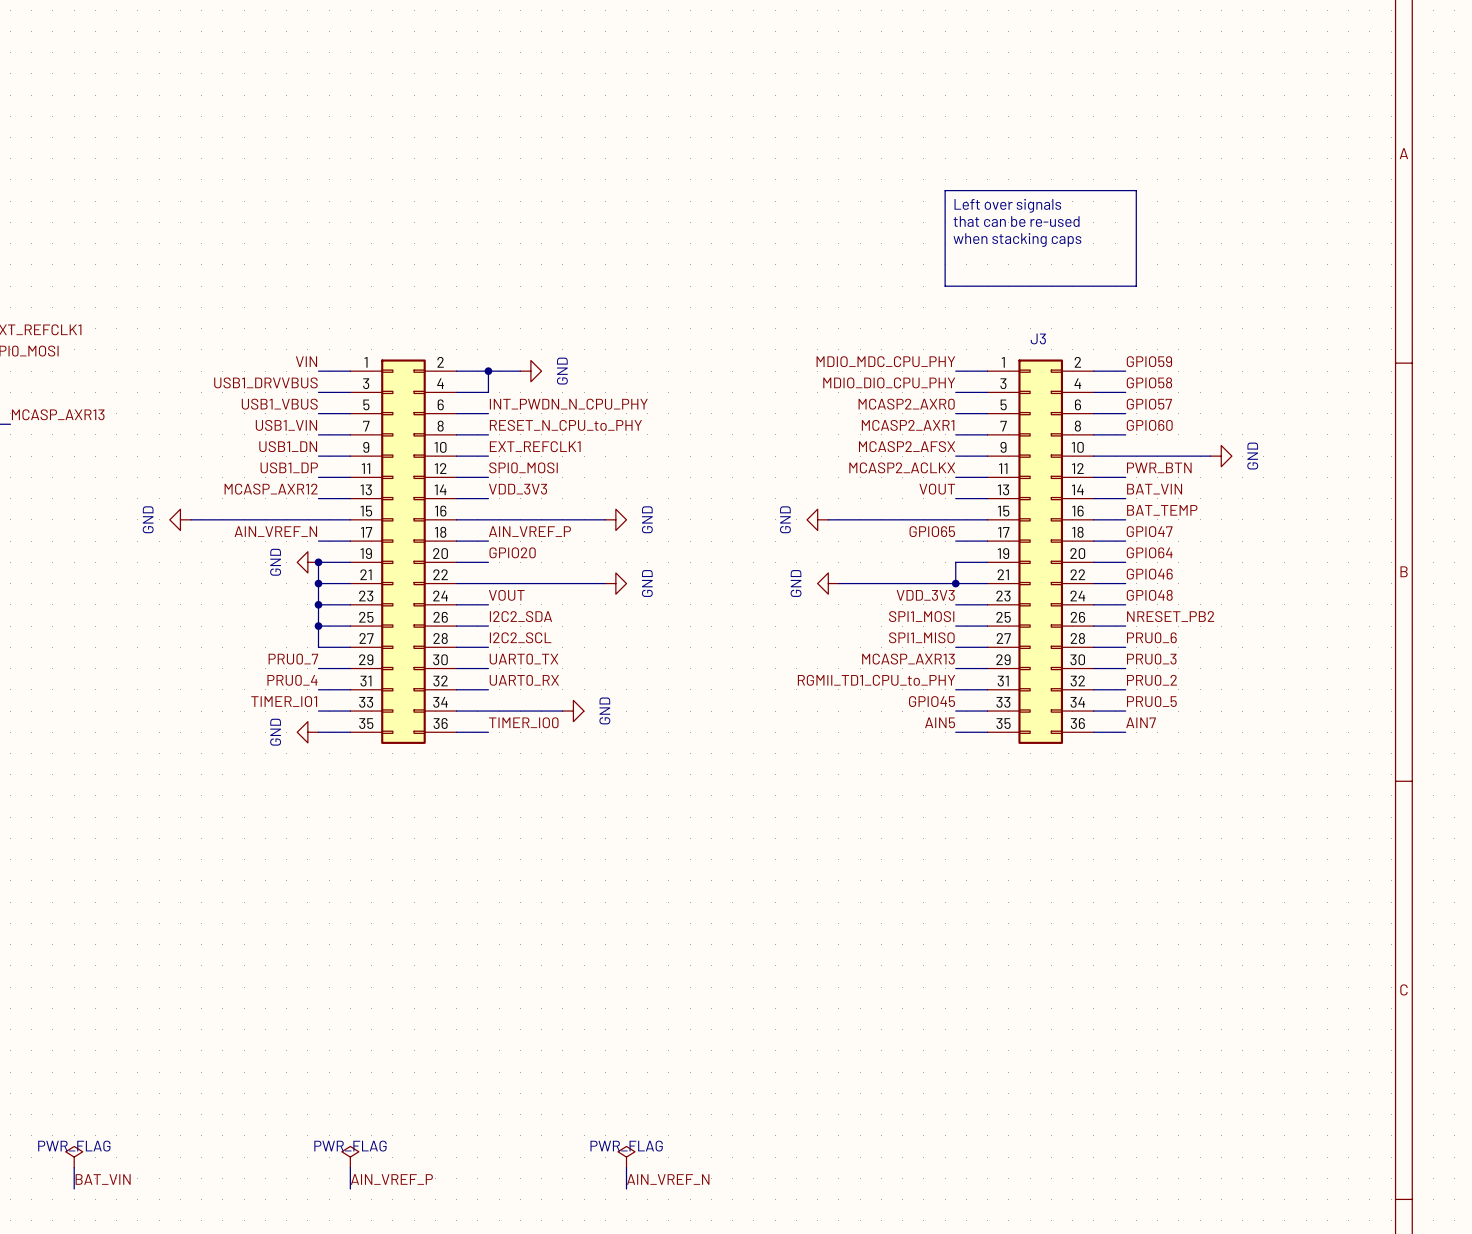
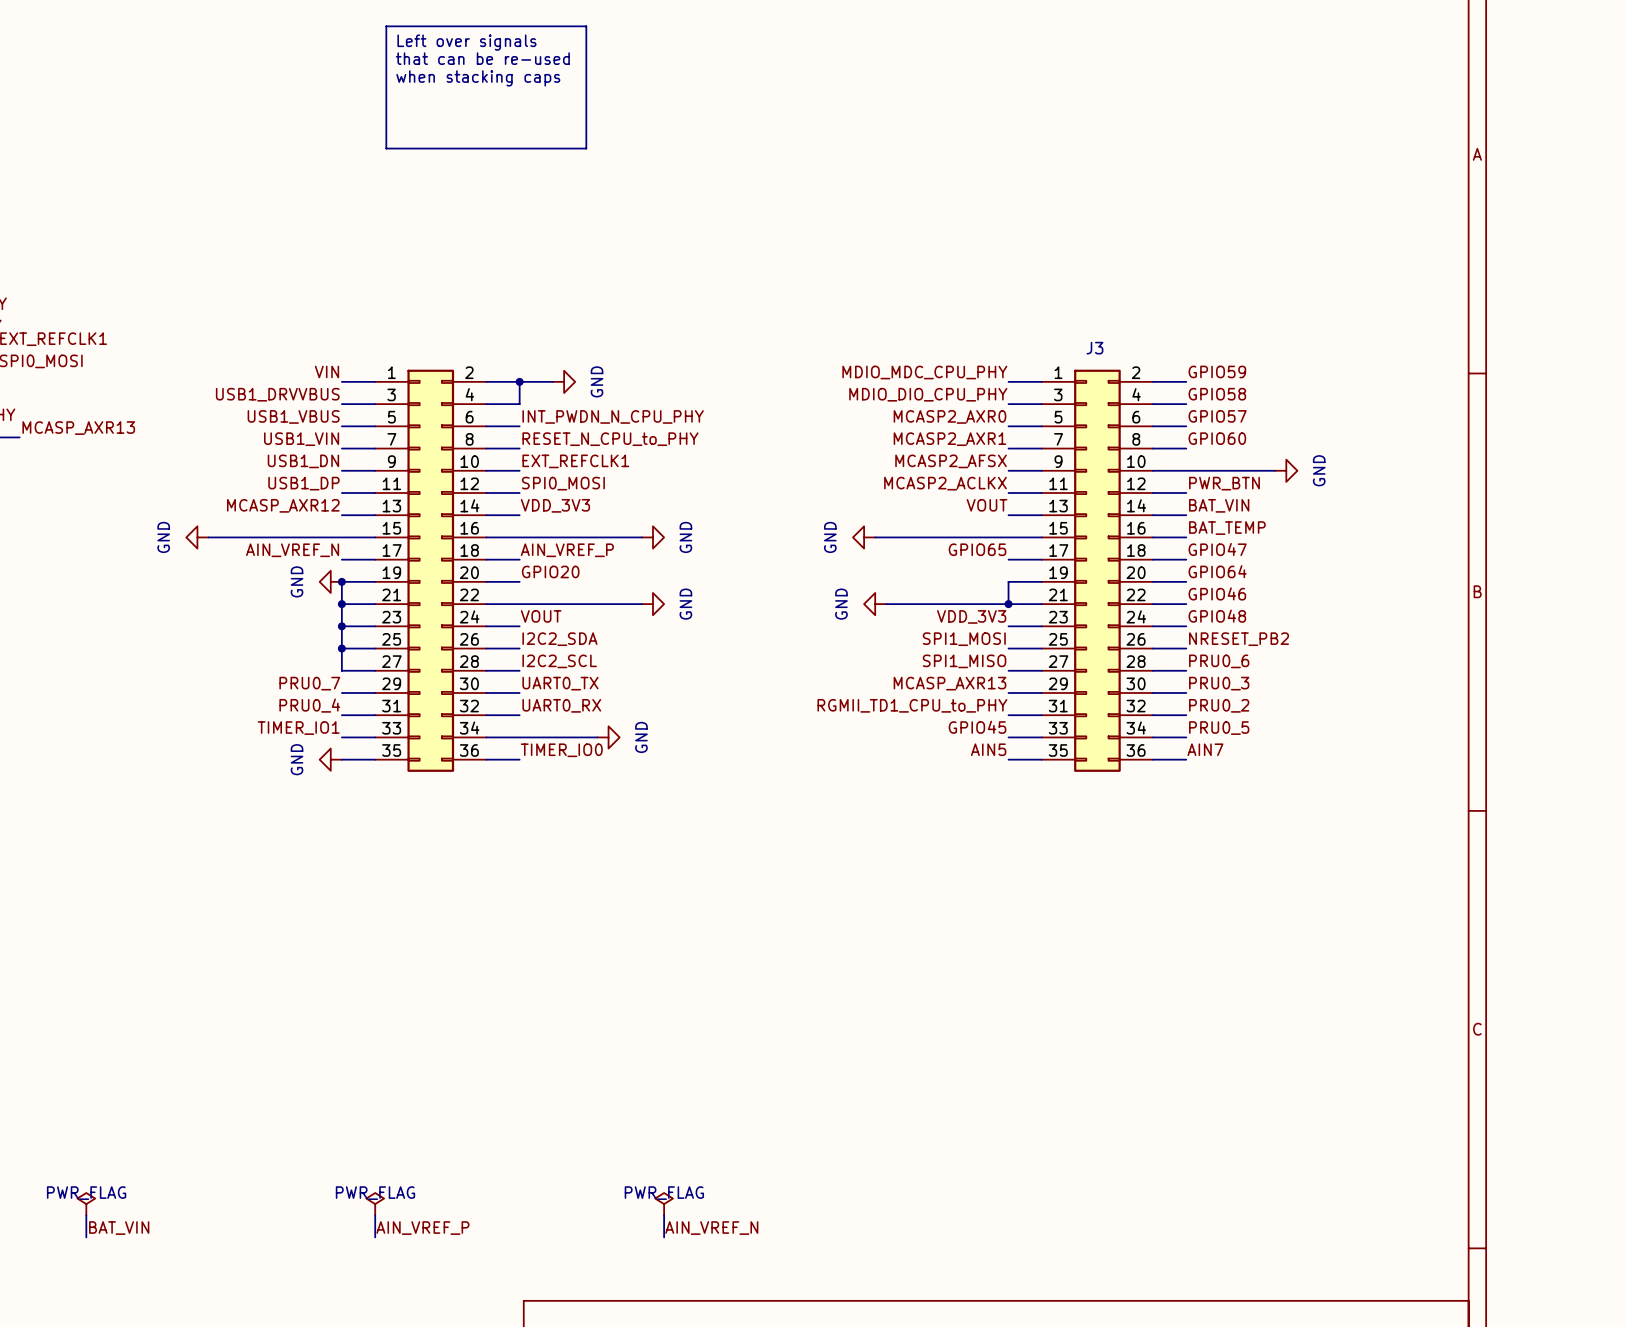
line: none -> (386, 26) (586, 26) (586, 148) (386, 148) (386, 26)
text: none -> Left over signals (466, 42)
text: none -> that can be re-used (482, 58)
text: none -> when stacking caps (478, 78)
line: (945, 190) (1136, 190) (1136, 286) (945, 286) (945, 190) -> none
text: Left over signals (1007, 205) -> none
text: that can be re-used (1016, 221) -> none
text: when stacking caps (1017, 240) -> none

